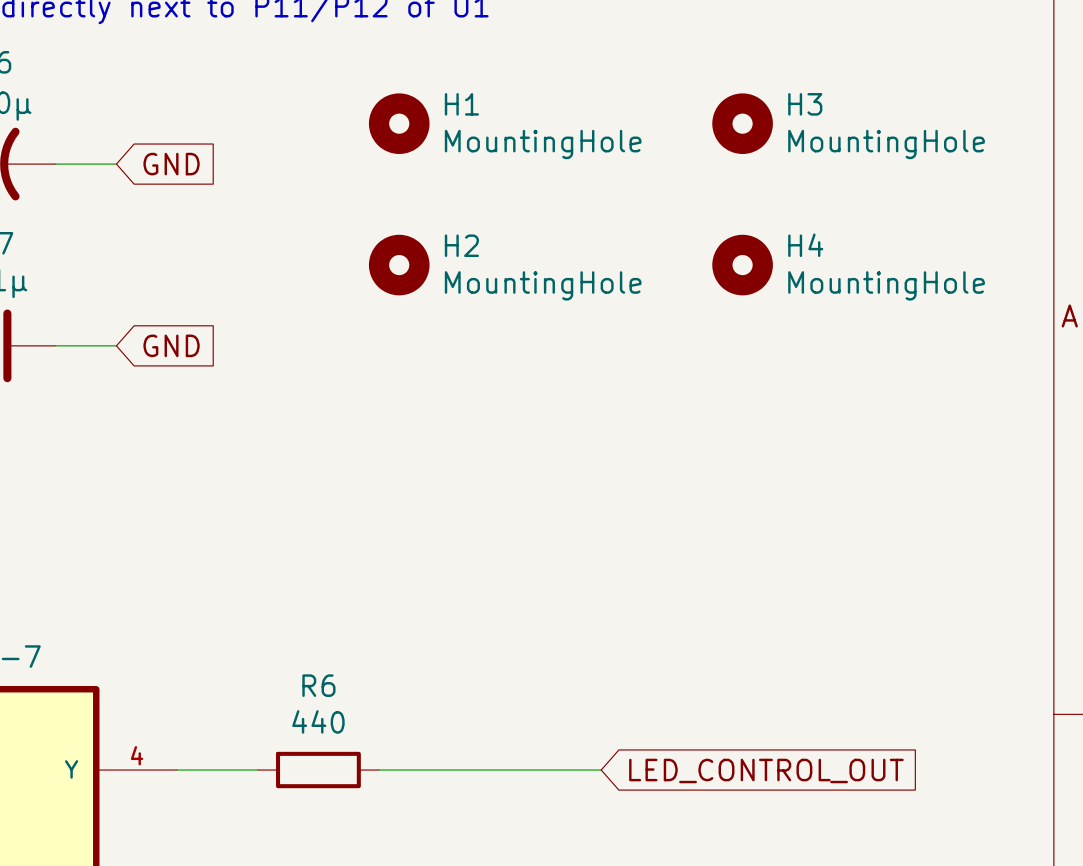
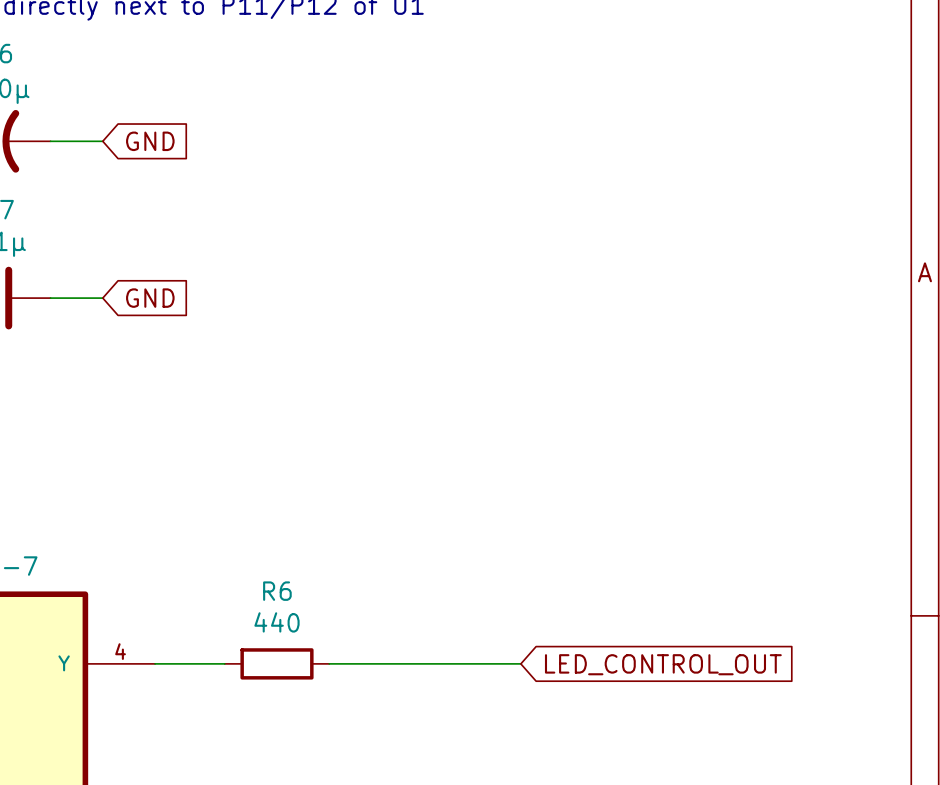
H1: MountingHole (399, 123) -> none
H3: MountingHole (742, 123) -> none
H2: MountingHole (399, 265) -> none
H4: MountingHole (742, 265) -> none

